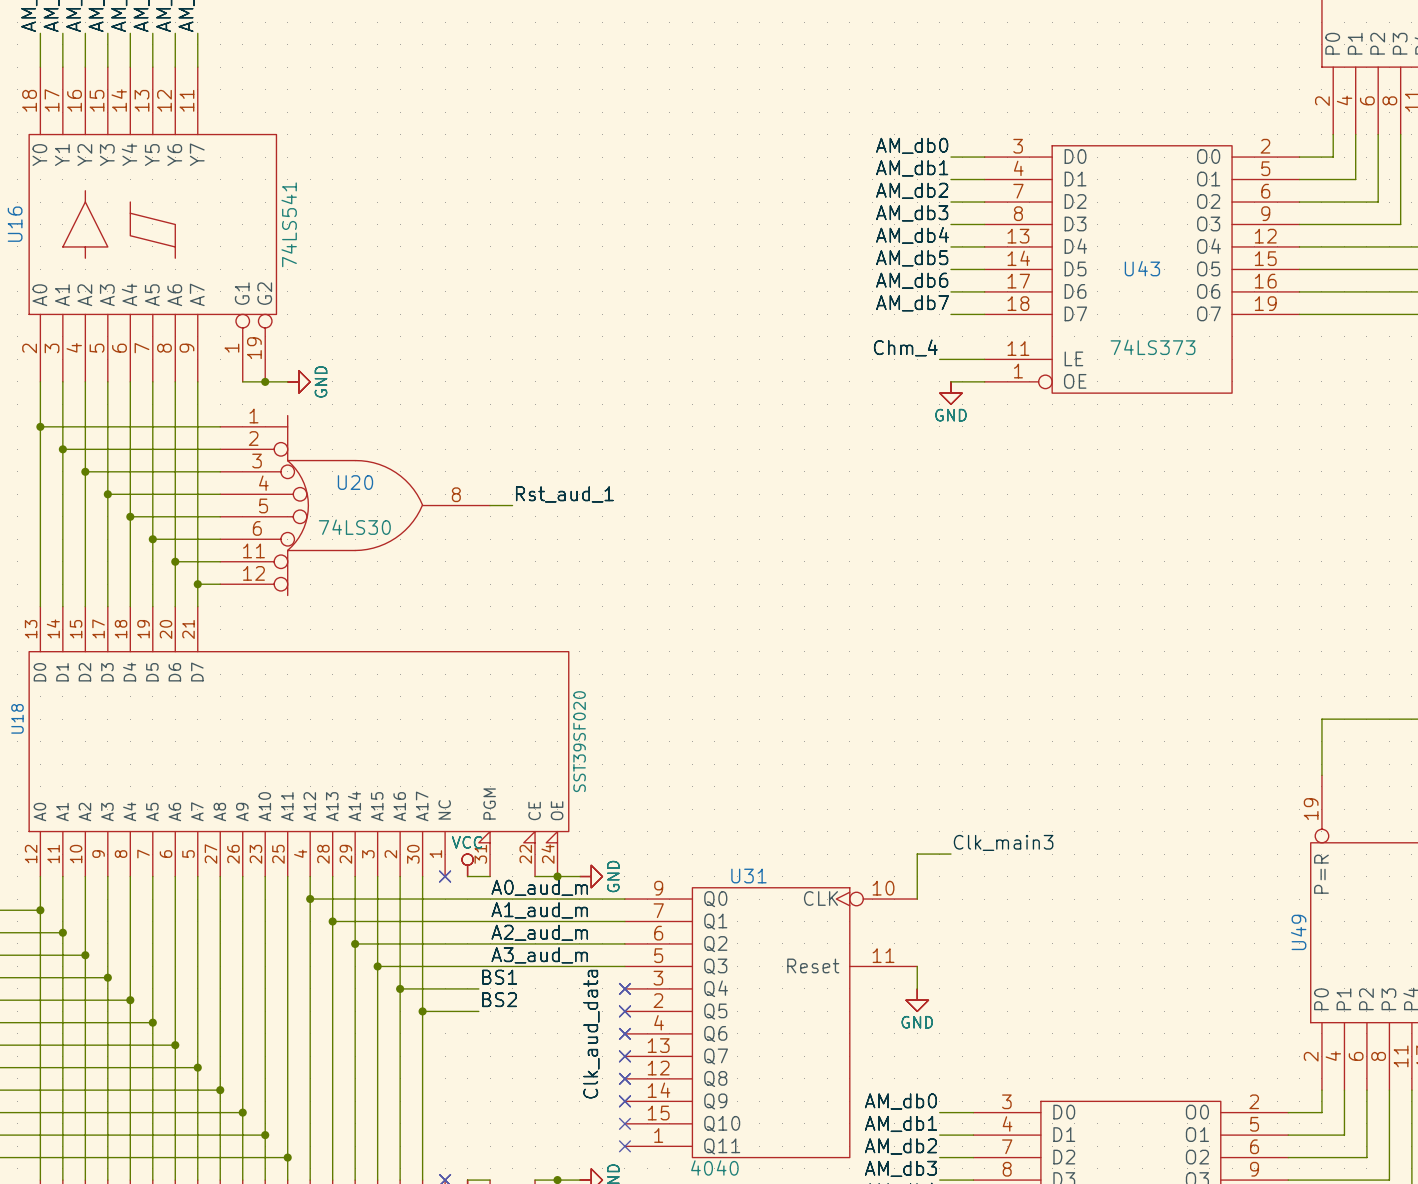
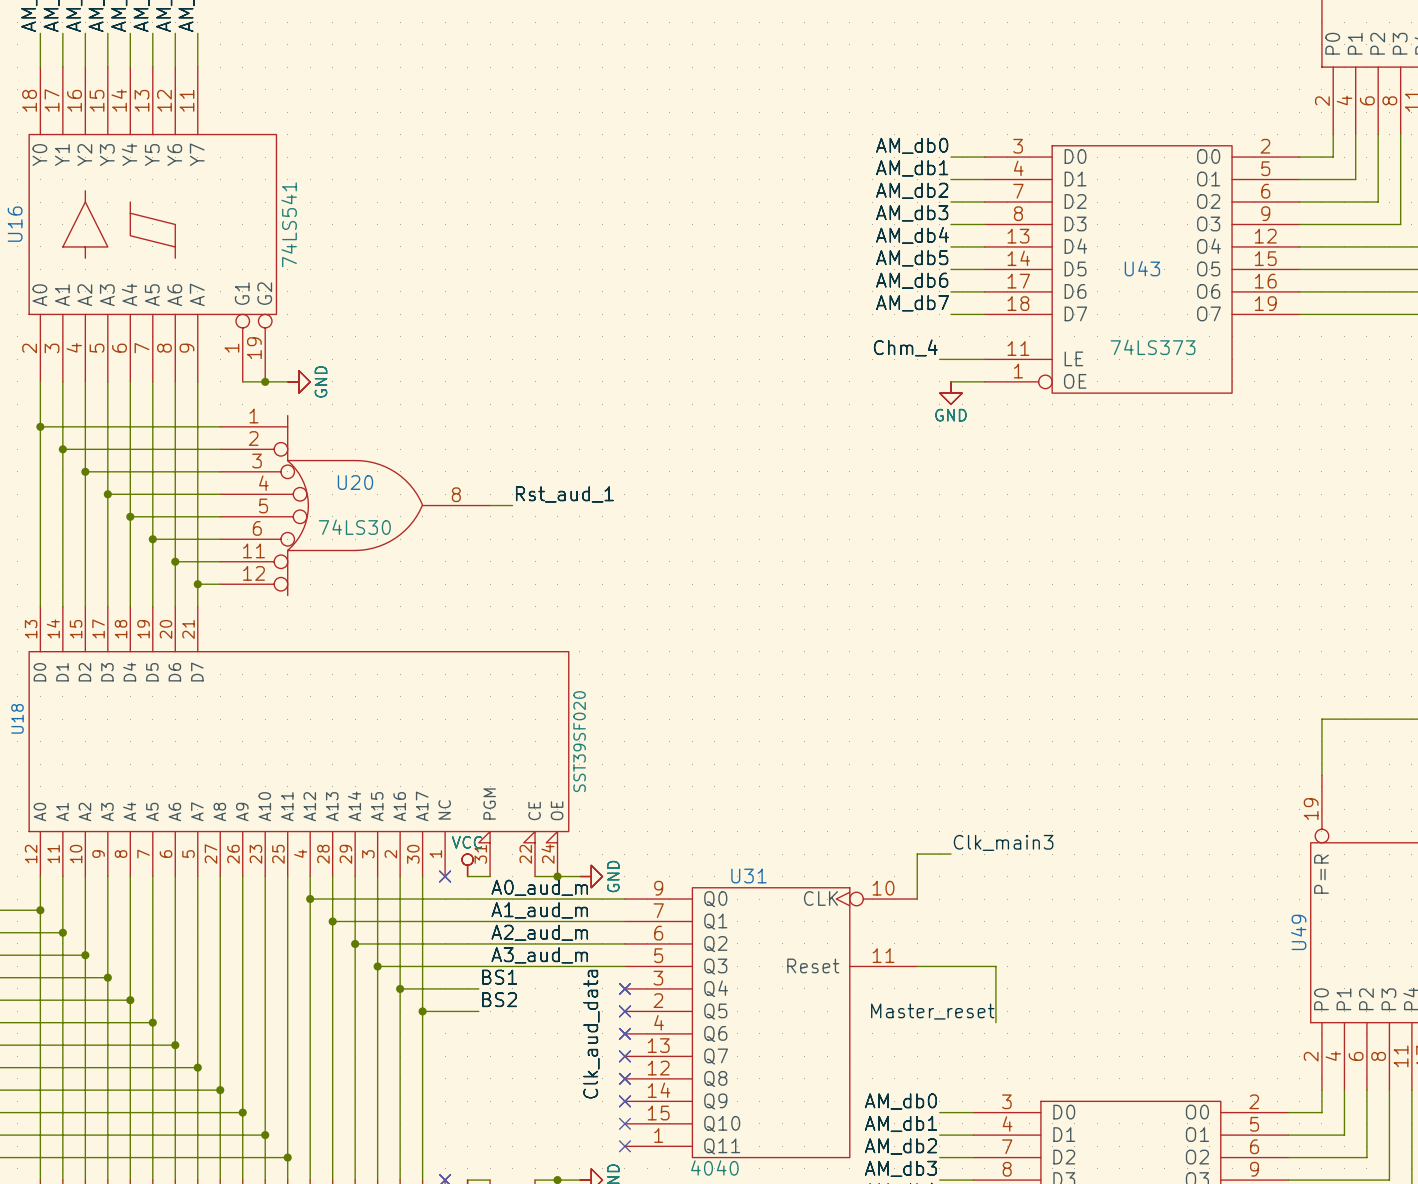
wire: (917, 966) (917, 988) -> (917, 966) (995, 966) (995, 1022)
power symbol: GND (917, 1000) -> none
label: none -> Master_reset (932, 1011)

